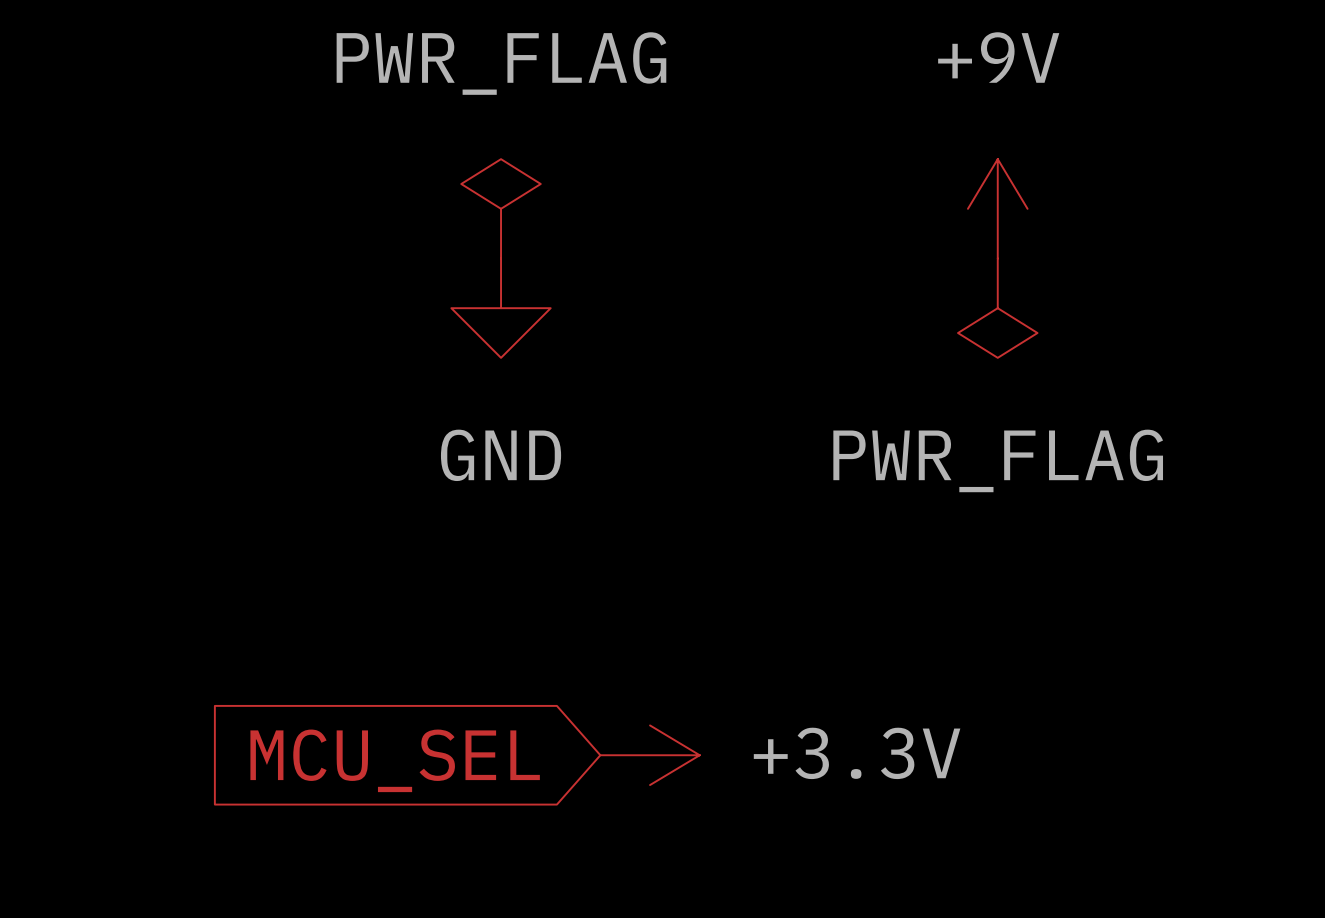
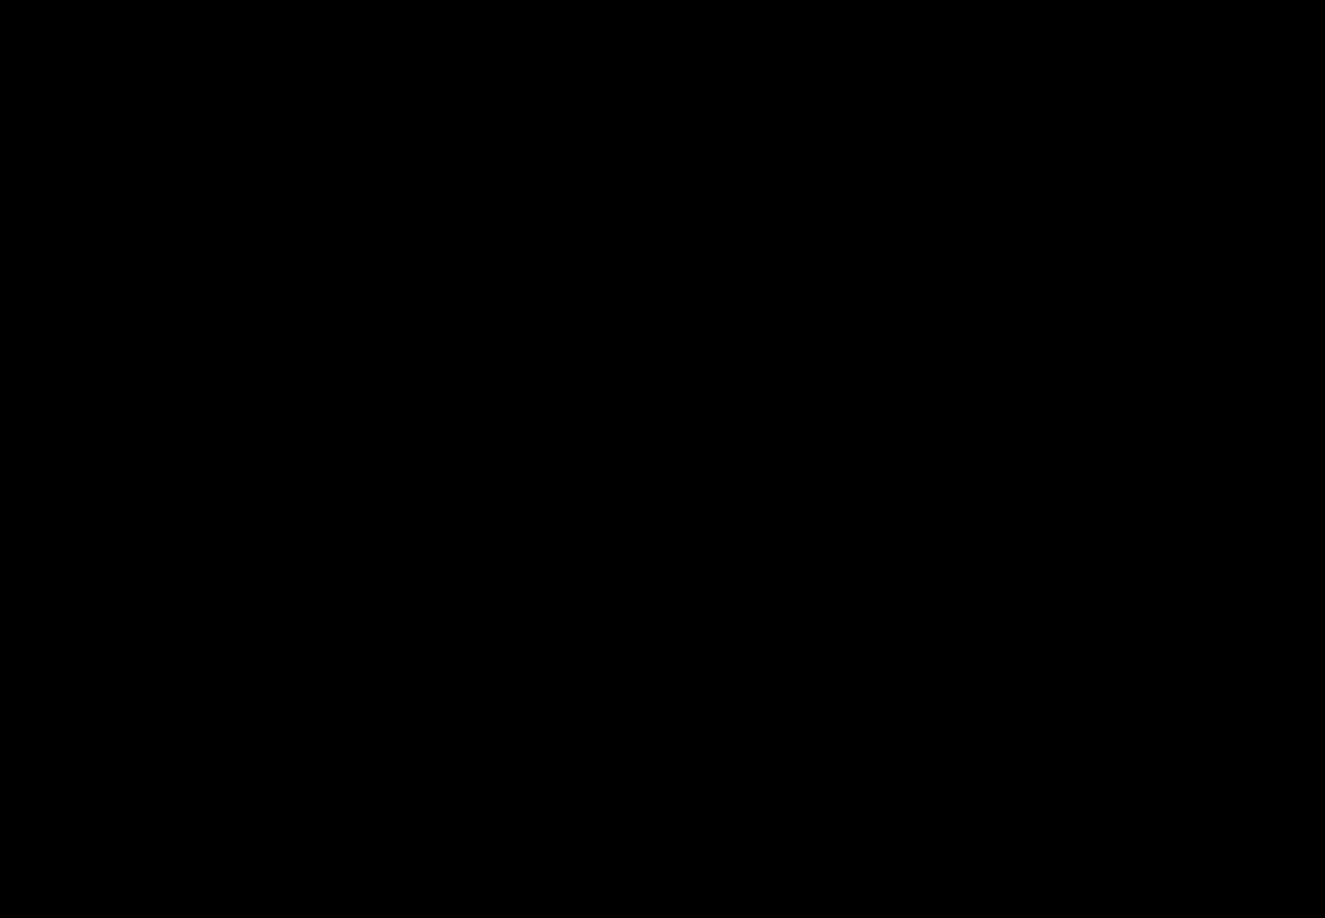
power symbol: PWR_FLAG (501, 208) -> none
power symbol: +9V (997, 208) -> none
power symbol: GND (501, 308) -> none
power symbol: PWR_FLAG (997, 308) -> none
power symbol: +3.3V (650, 755) -> none
global label: MCU_SEL (395, 760) -> none

